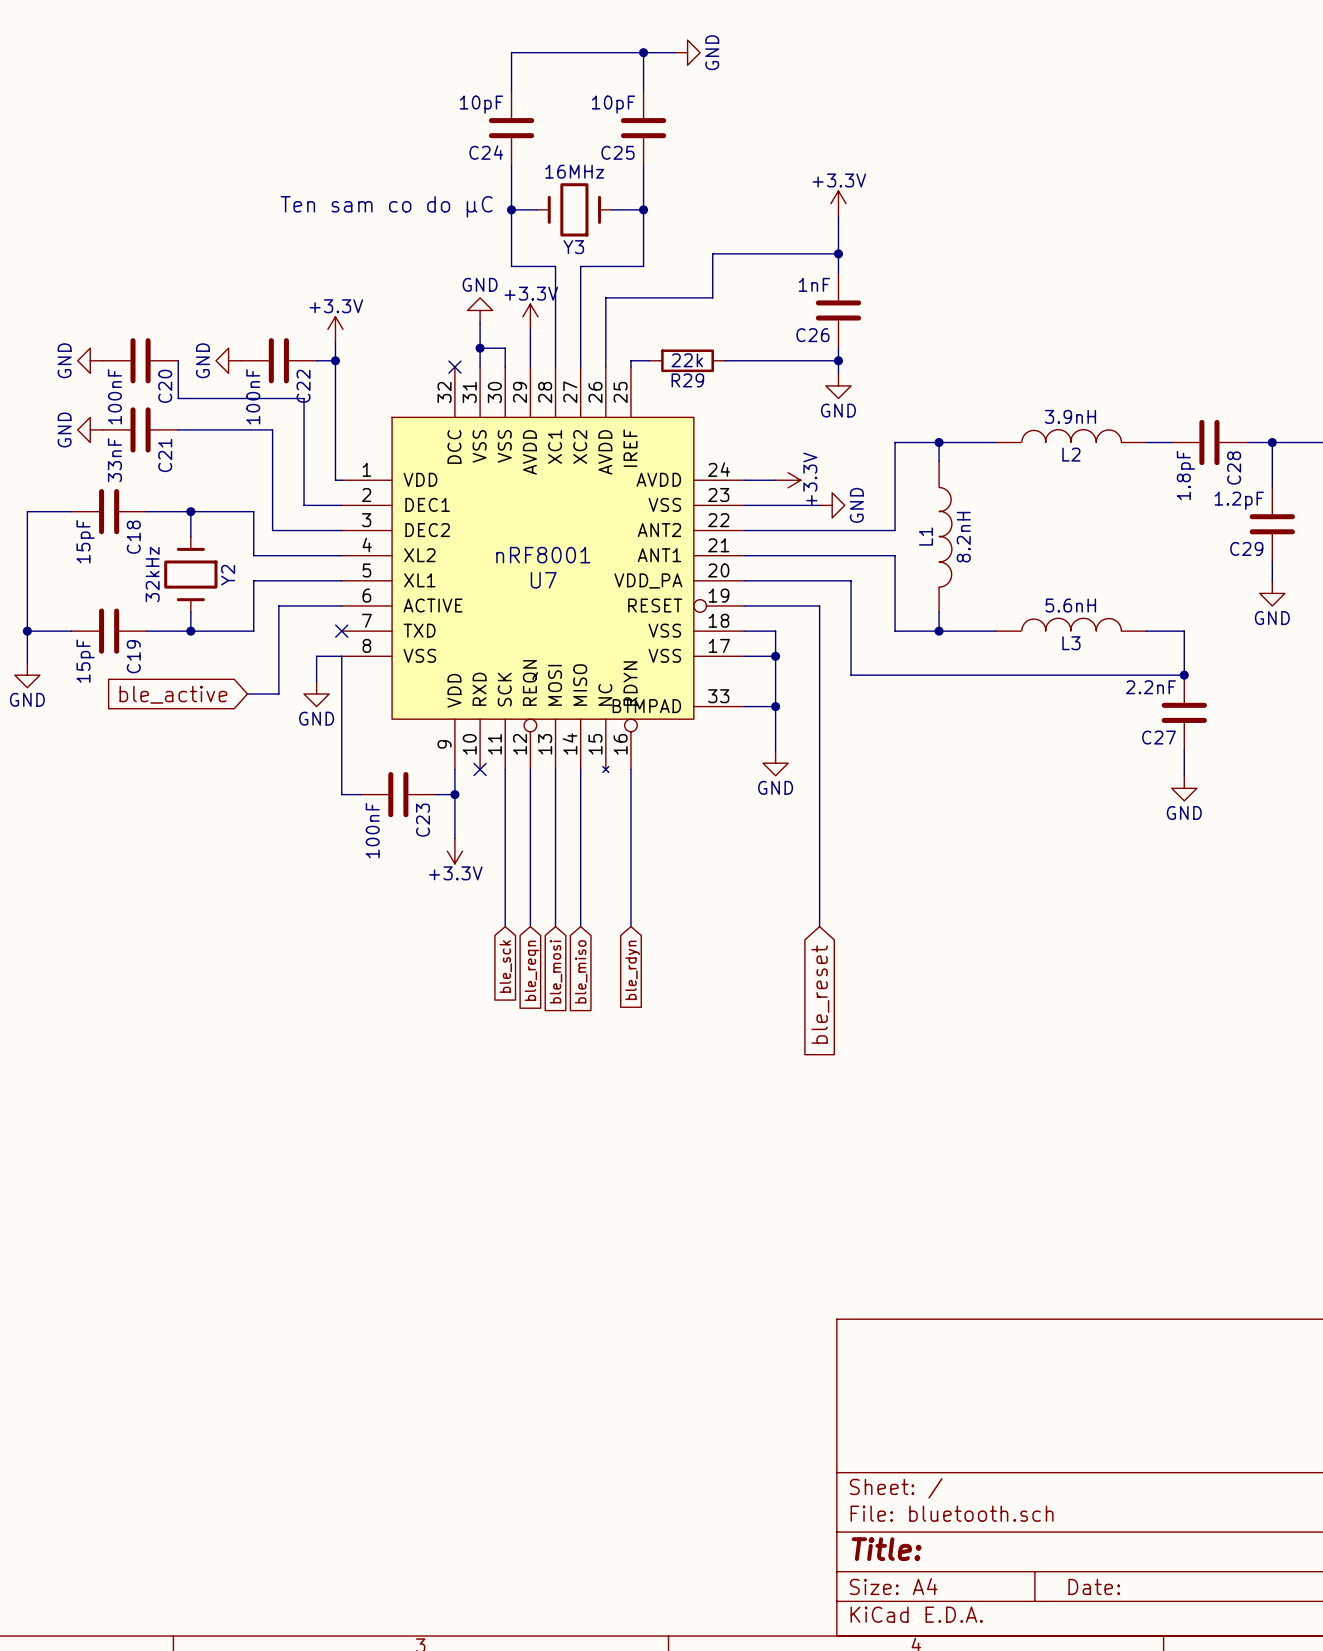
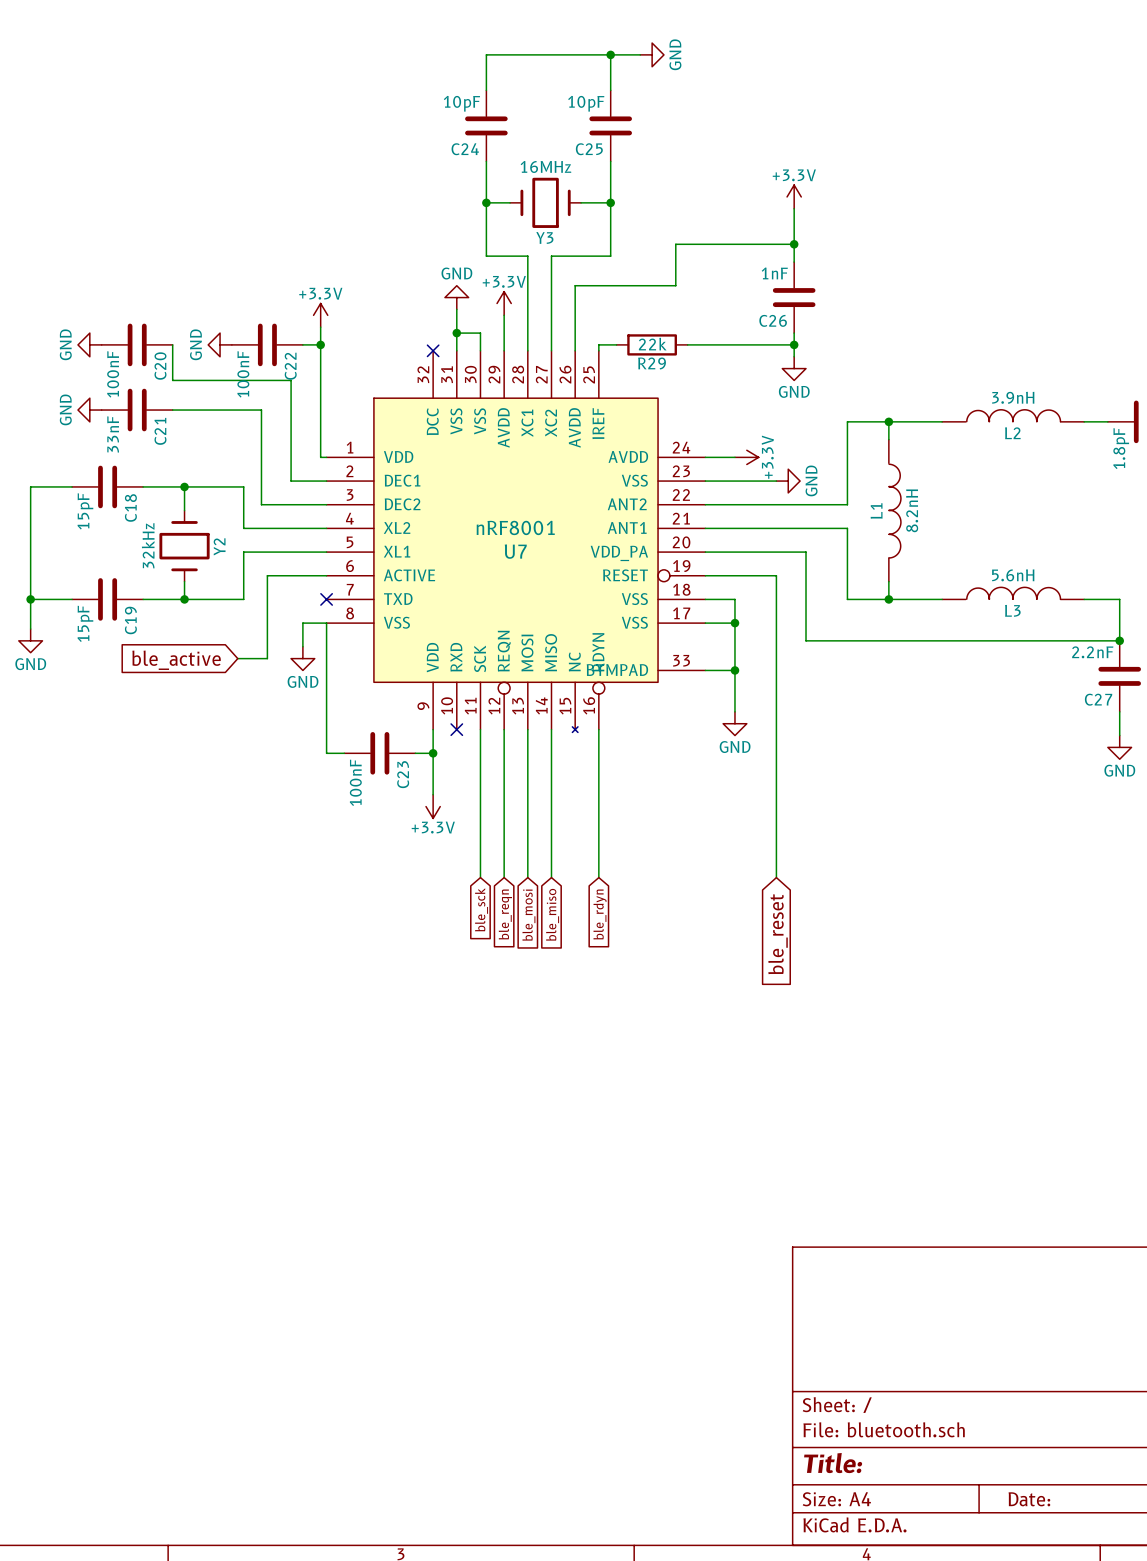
text: Ten sam co do µC (386, 206) -> none

